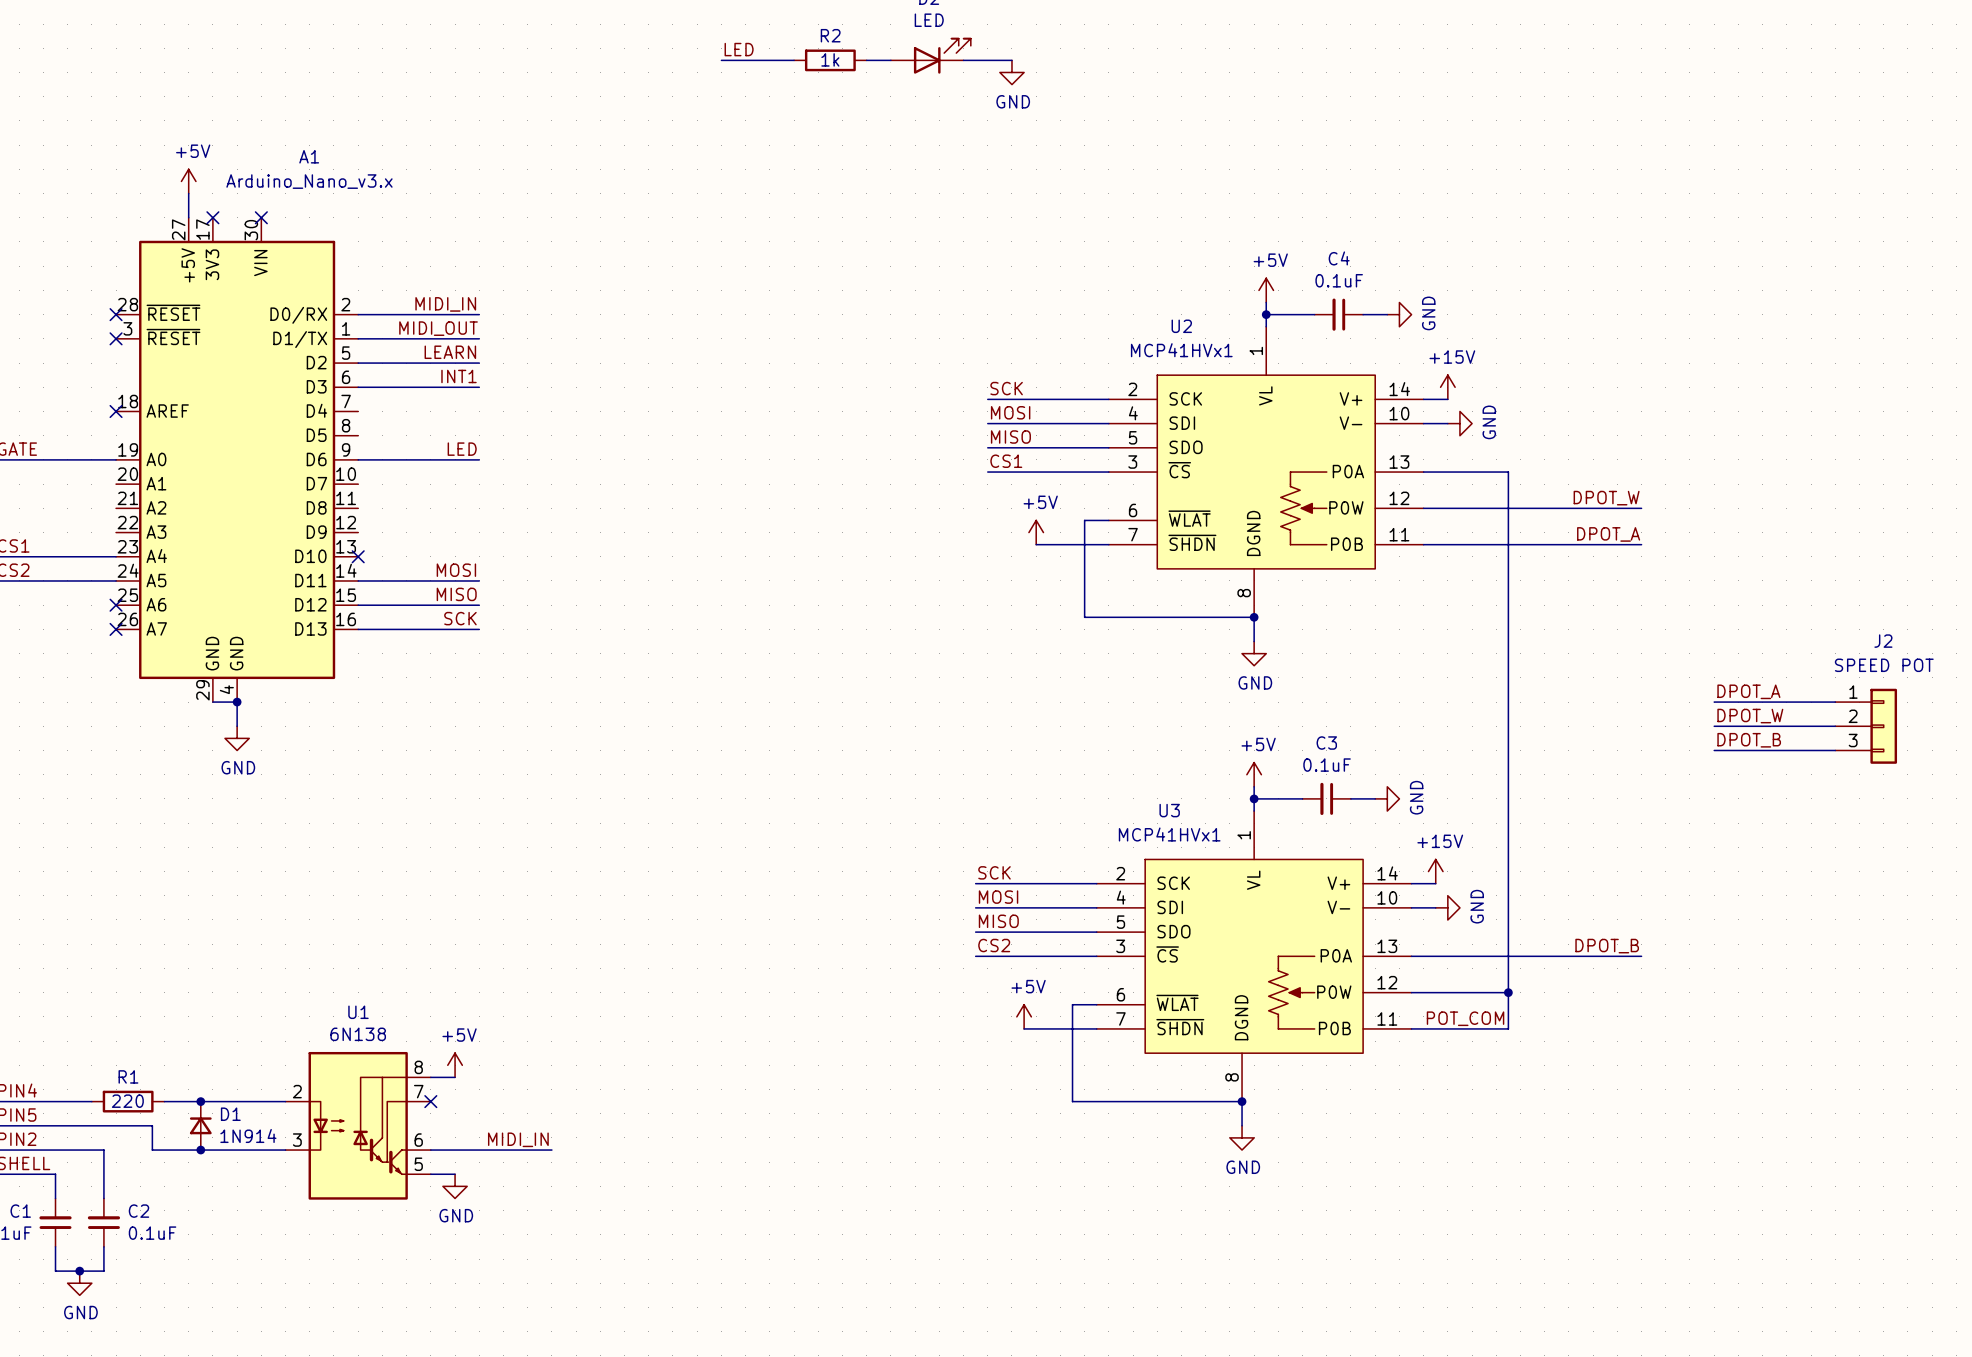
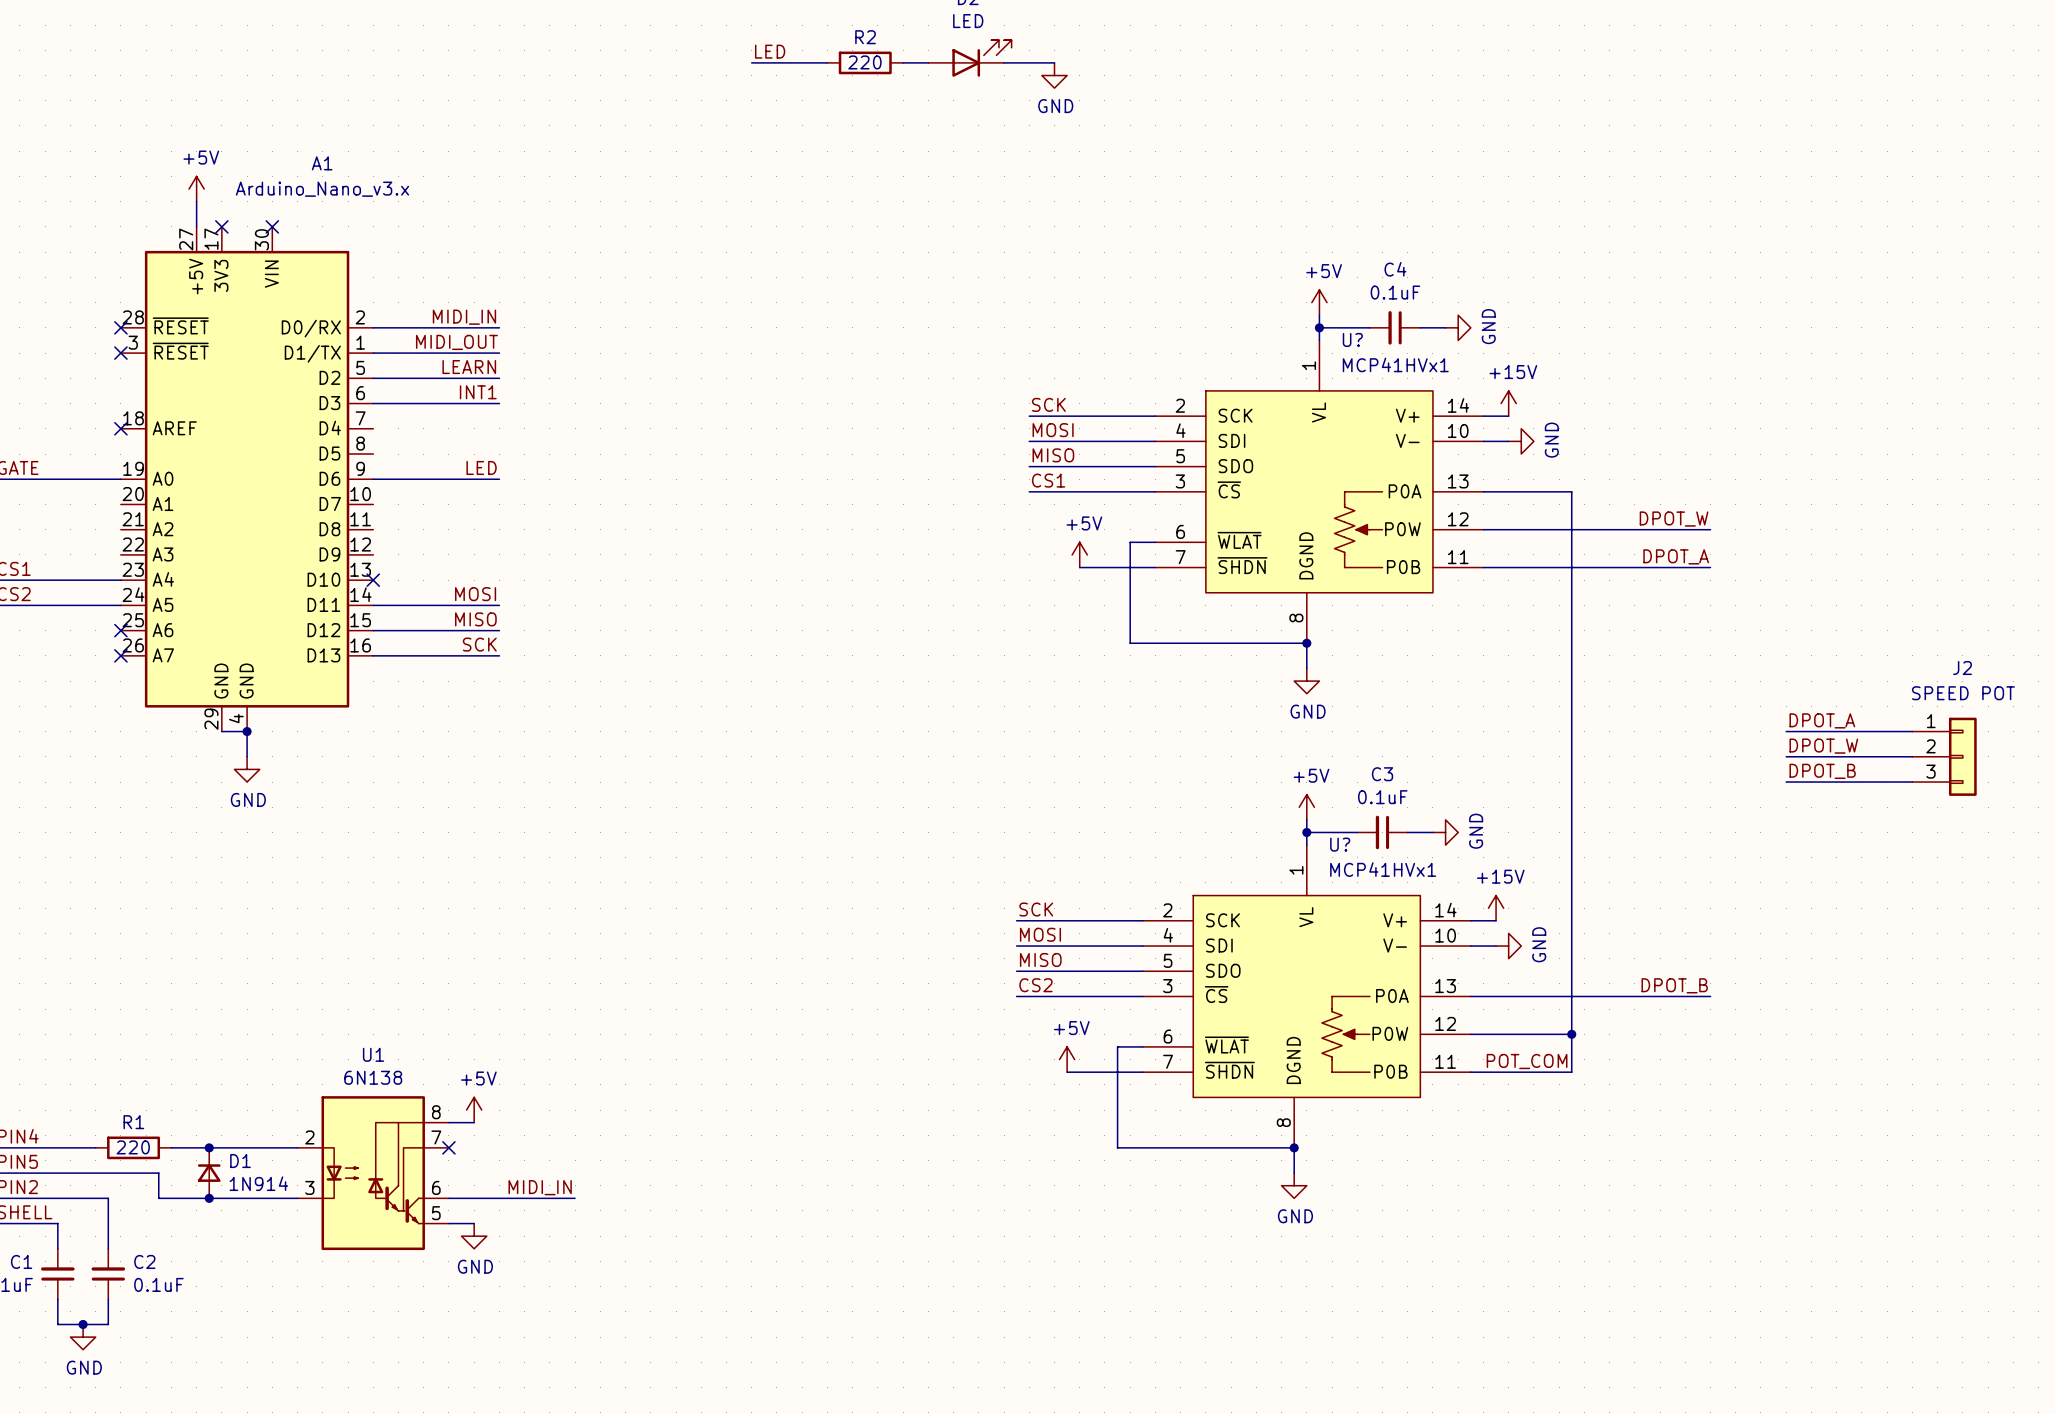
R2 value: 1k (830, 59) -> 220 (864, 62)
U2 name: U2 (1181, 326) -> U? (1352, 339)
U2 value position: MCP41HVx1 (1181, 350) -> MCP41HVx1 (1395, 364)
U3 name: U3 (1169, 810) -> U? (1340, 844)
U3 value position: MCP41HVx1 (1169, 834) -> MCP41HVx1 (1383, 869)

